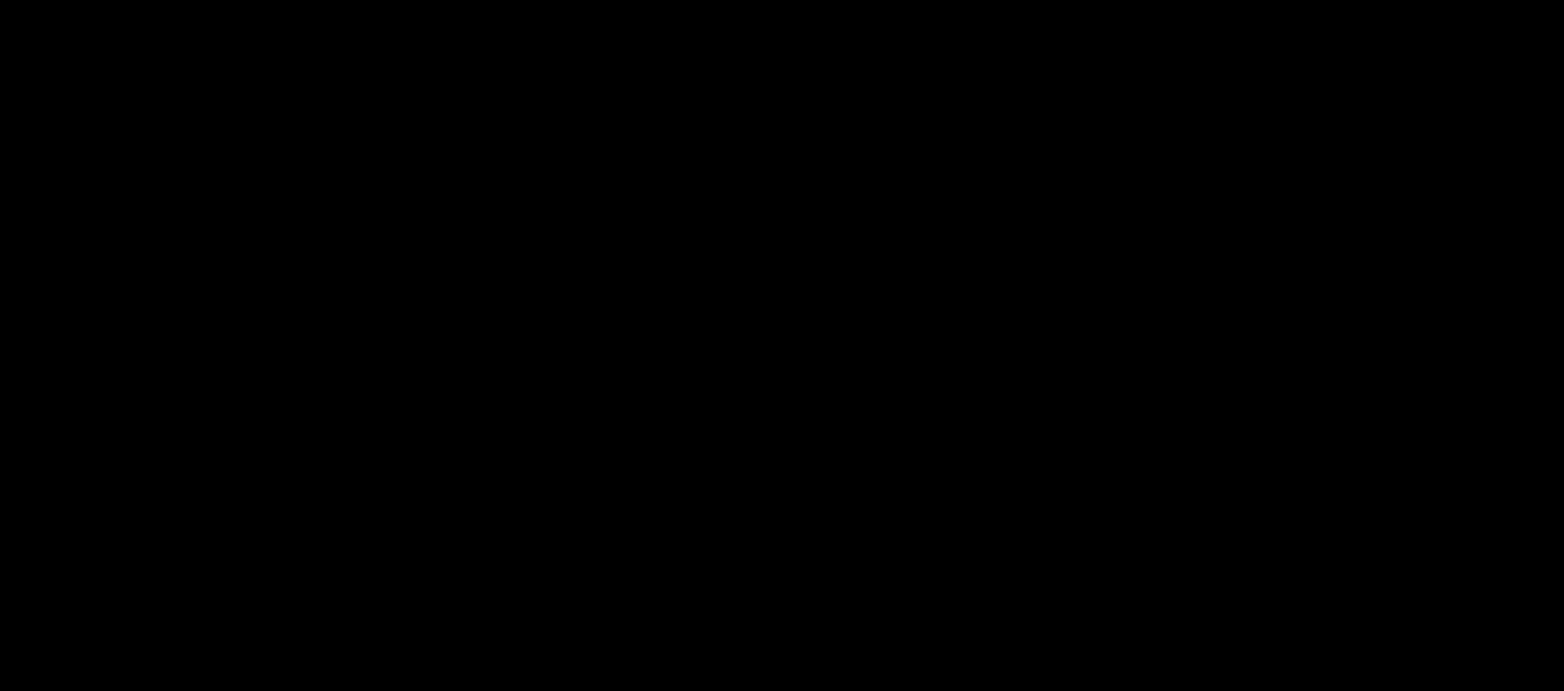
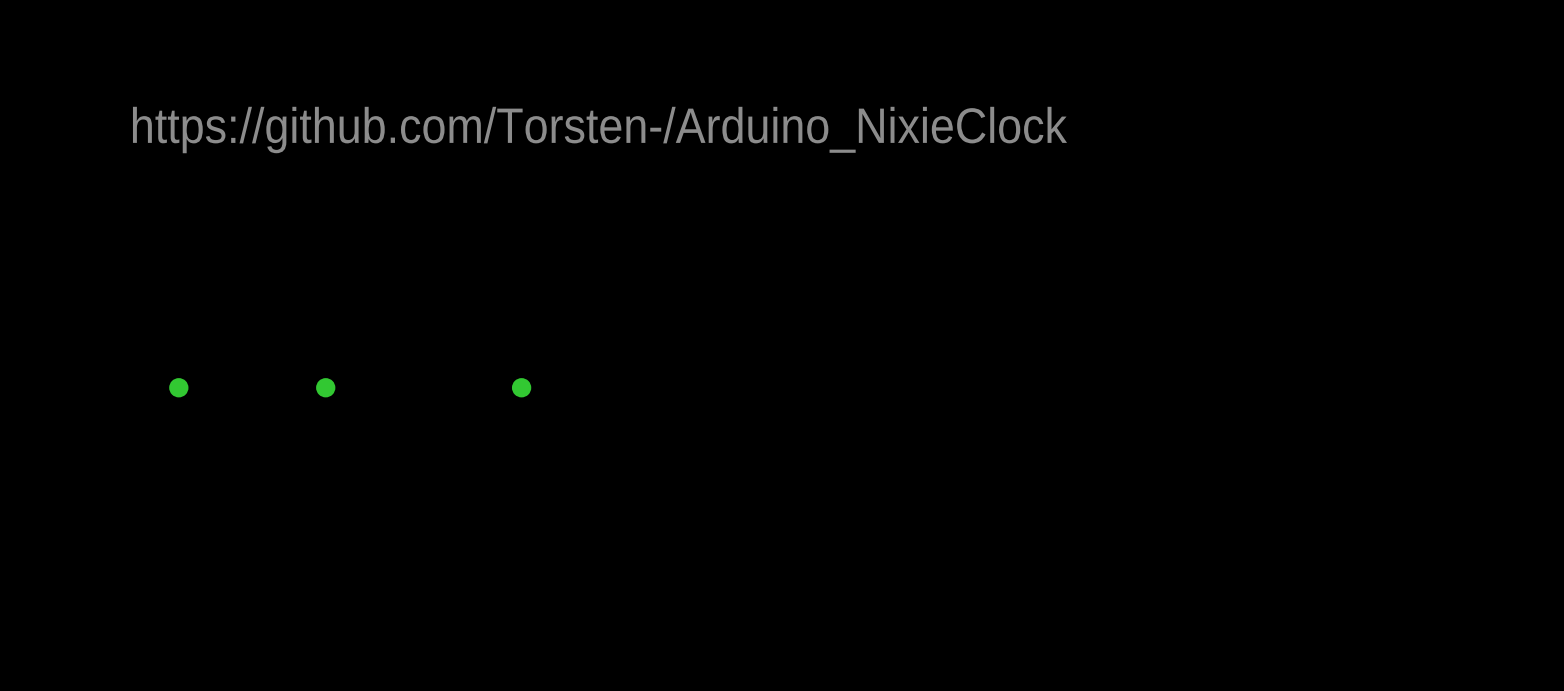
text: none -> https://github.com/Torsten-/Arduino_NixieClock (599, 130)
junction: none -> (178, 387)
junction: none -> (325, 387)
junction: none -> (521, 387)

